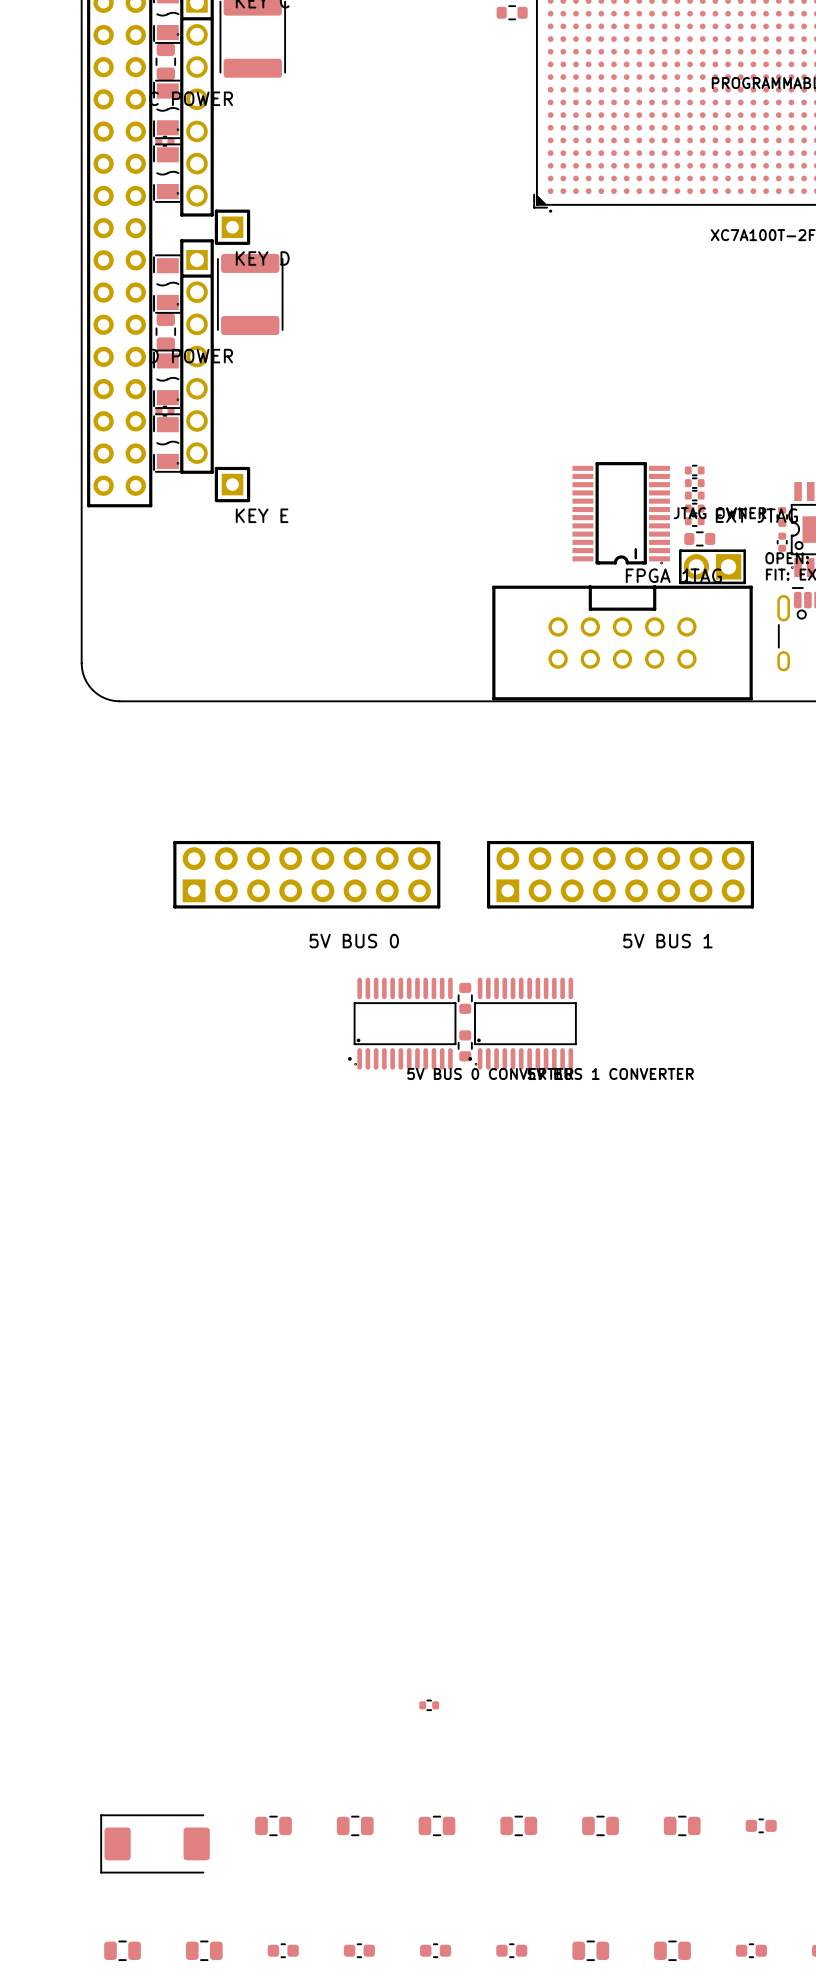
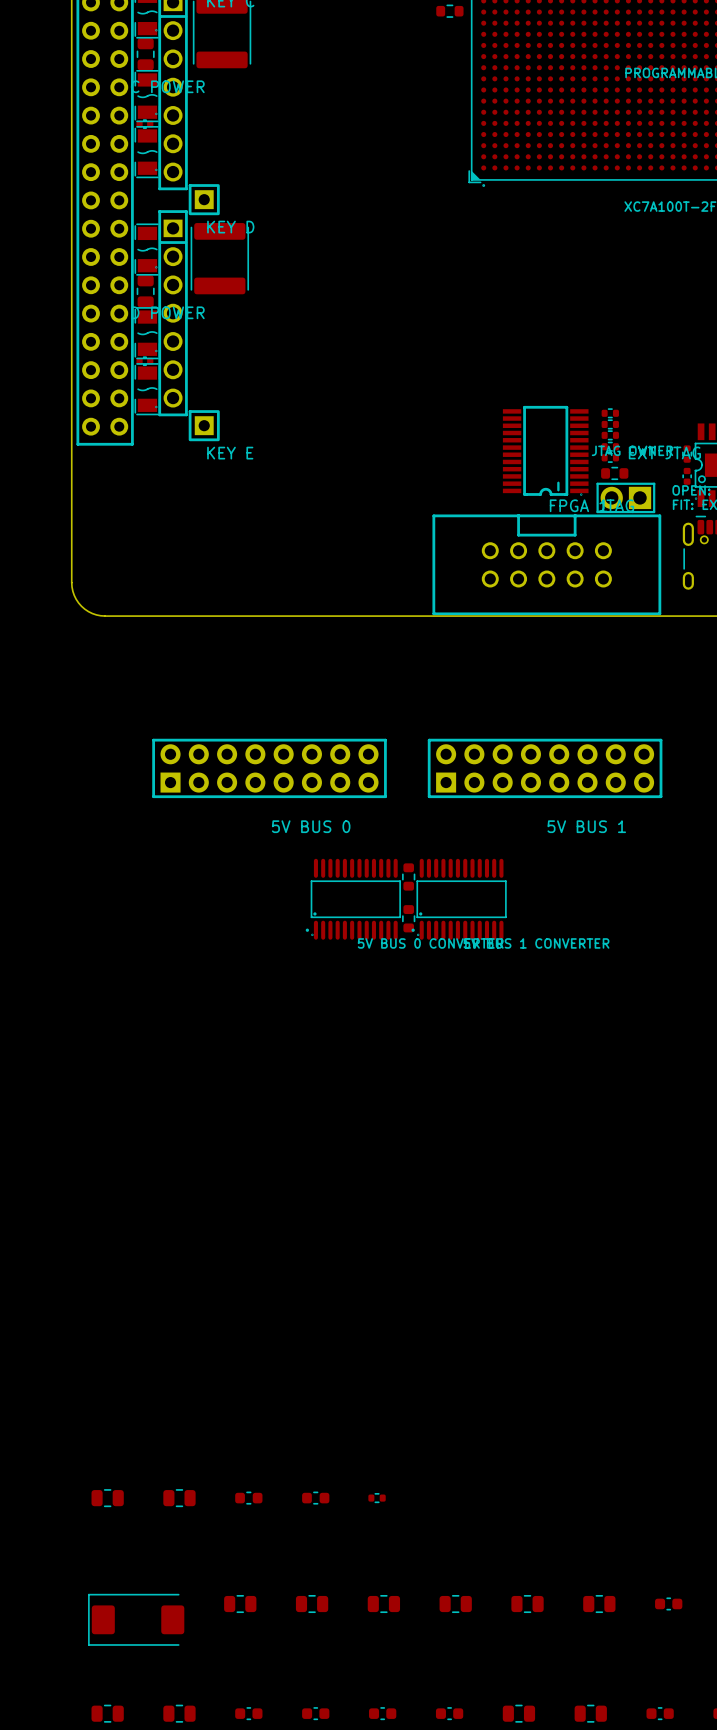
part: none -> (107, 1498)
part: none -> (179, 1498)
part: none -> (248, 1498)
part: none -> (315, 1498)

